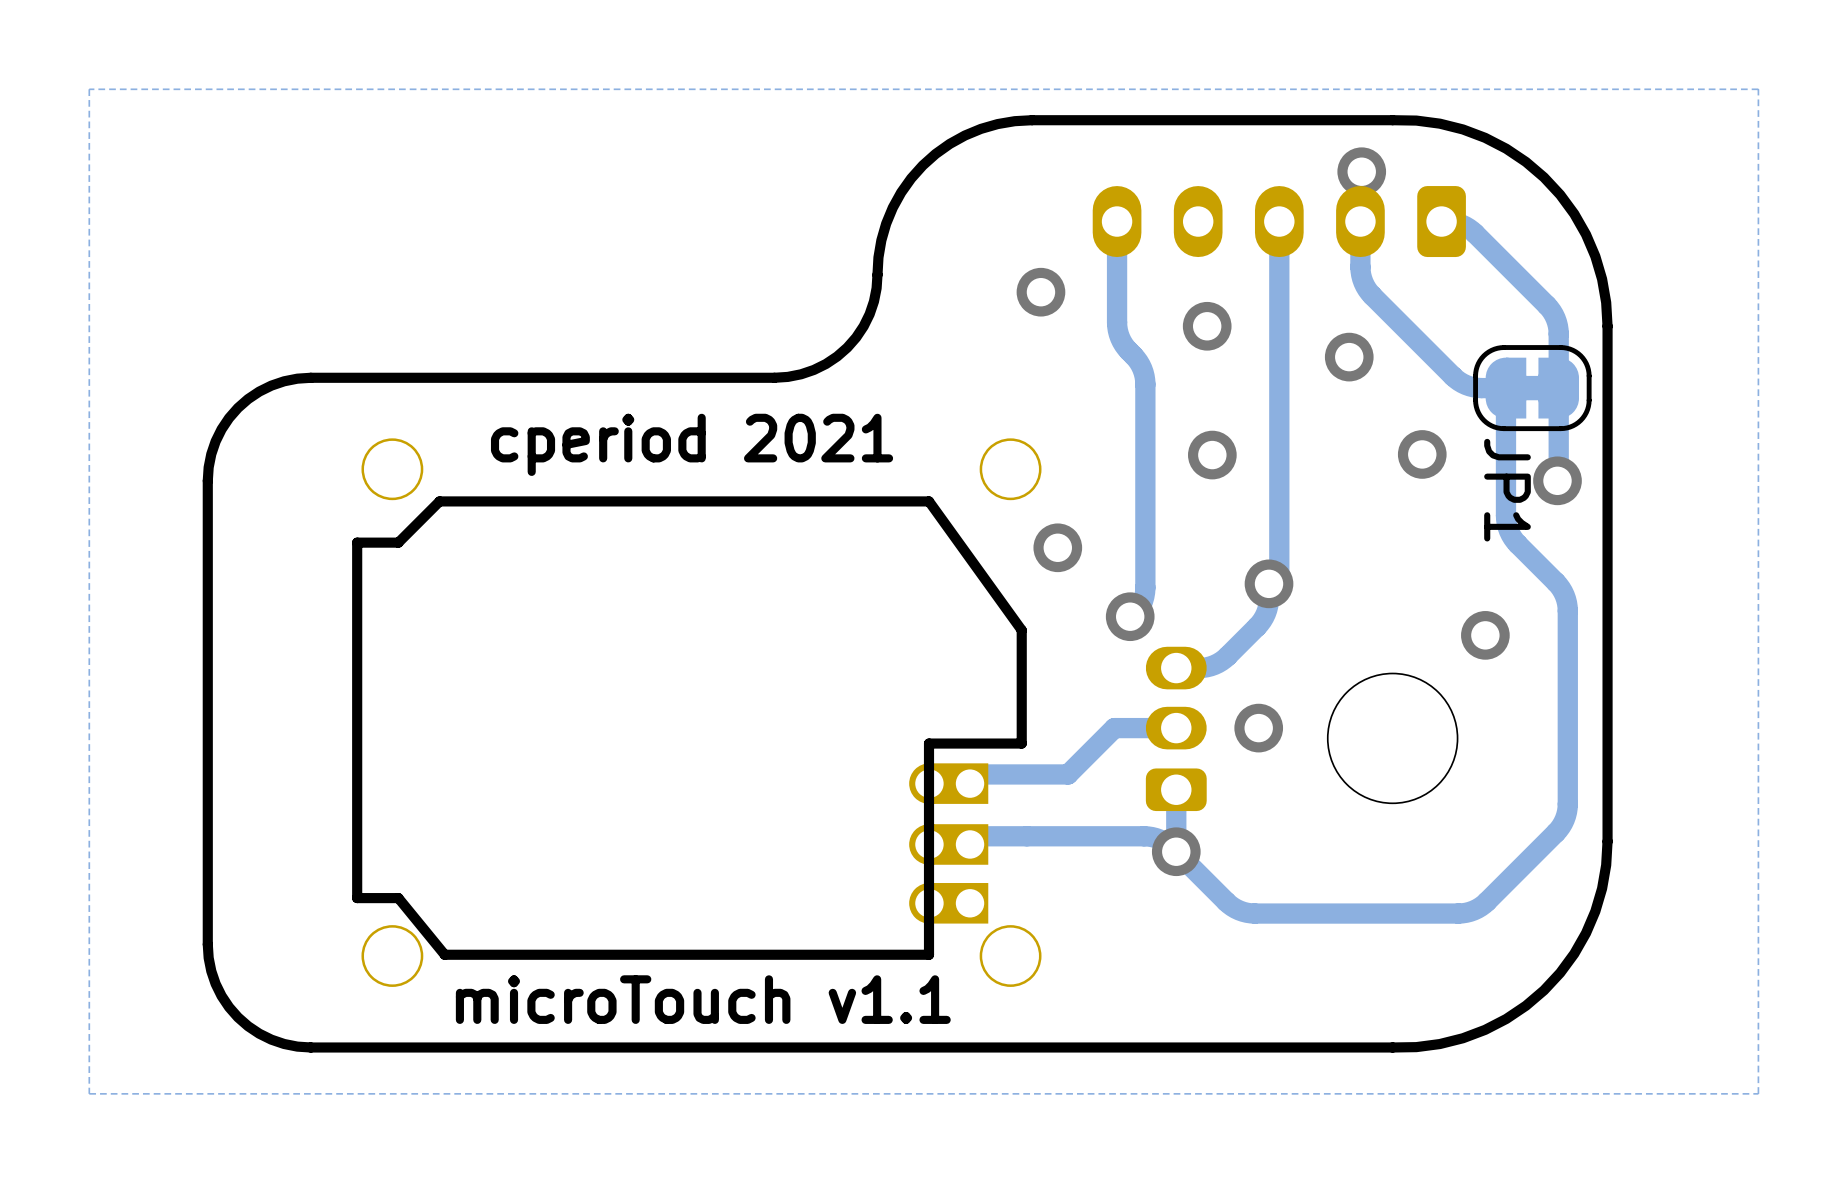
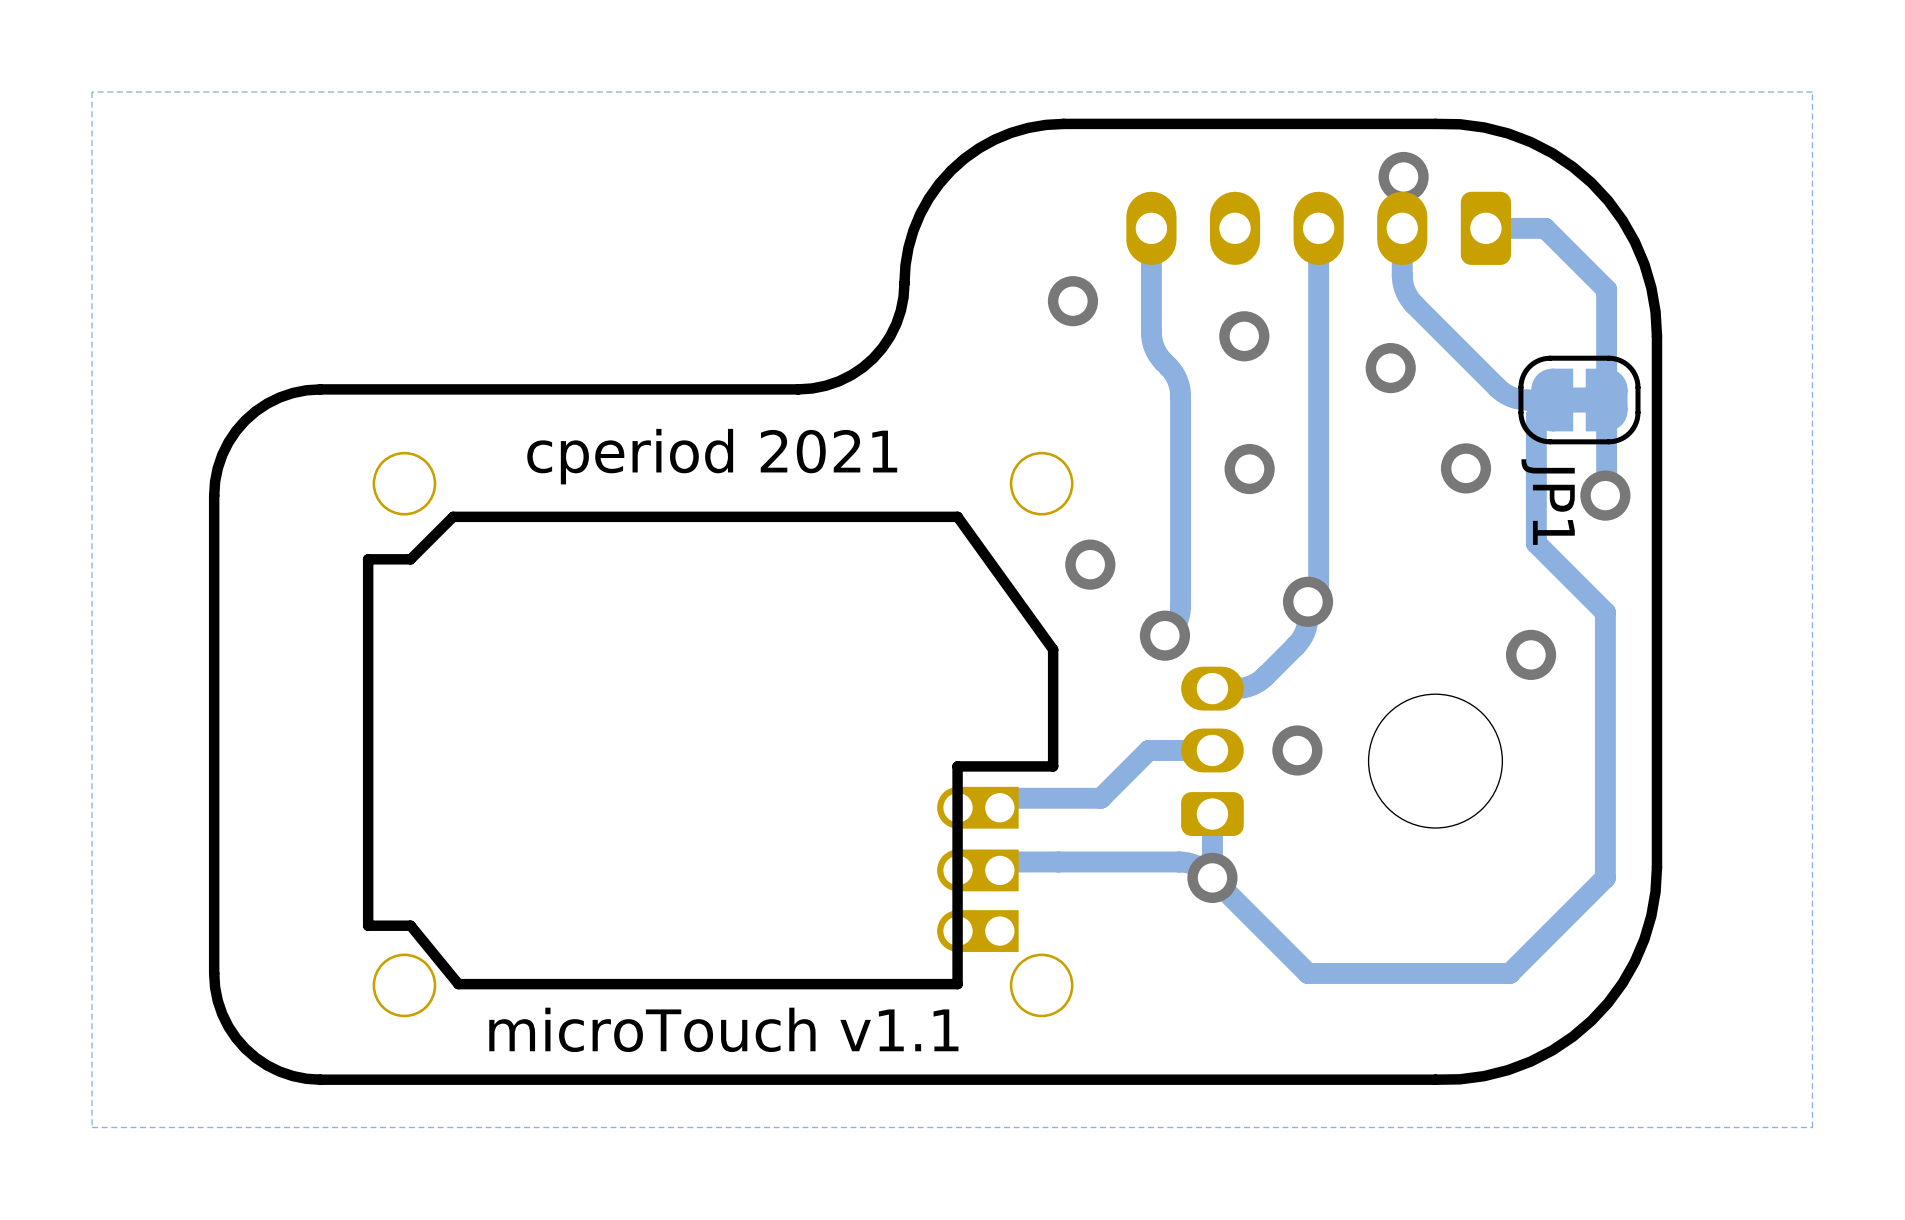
track: (1446, 221) (1461, 224) (1472, 230) (1546, 305) (1555, 318) (1558, 333) -> (1490, 228) (1545, 228) (1606, 289) (1606, 344)
track: (1505, 388) (1505, 515) (1507, 527) (1515, 541) (1558, 585) (1564, 595) (1567, 606) (1567, 804) (1563, 823) (1555, 832) (1486, 901) (1477, 908) (1466, 912) (1254, 913) (1239, 910) (1226, 901) -> (1552, 400) (1536, 415) (1536, 543) (1605, 612) (1605, 877) (1509, 973) (1308, 973) (1263, 929)

